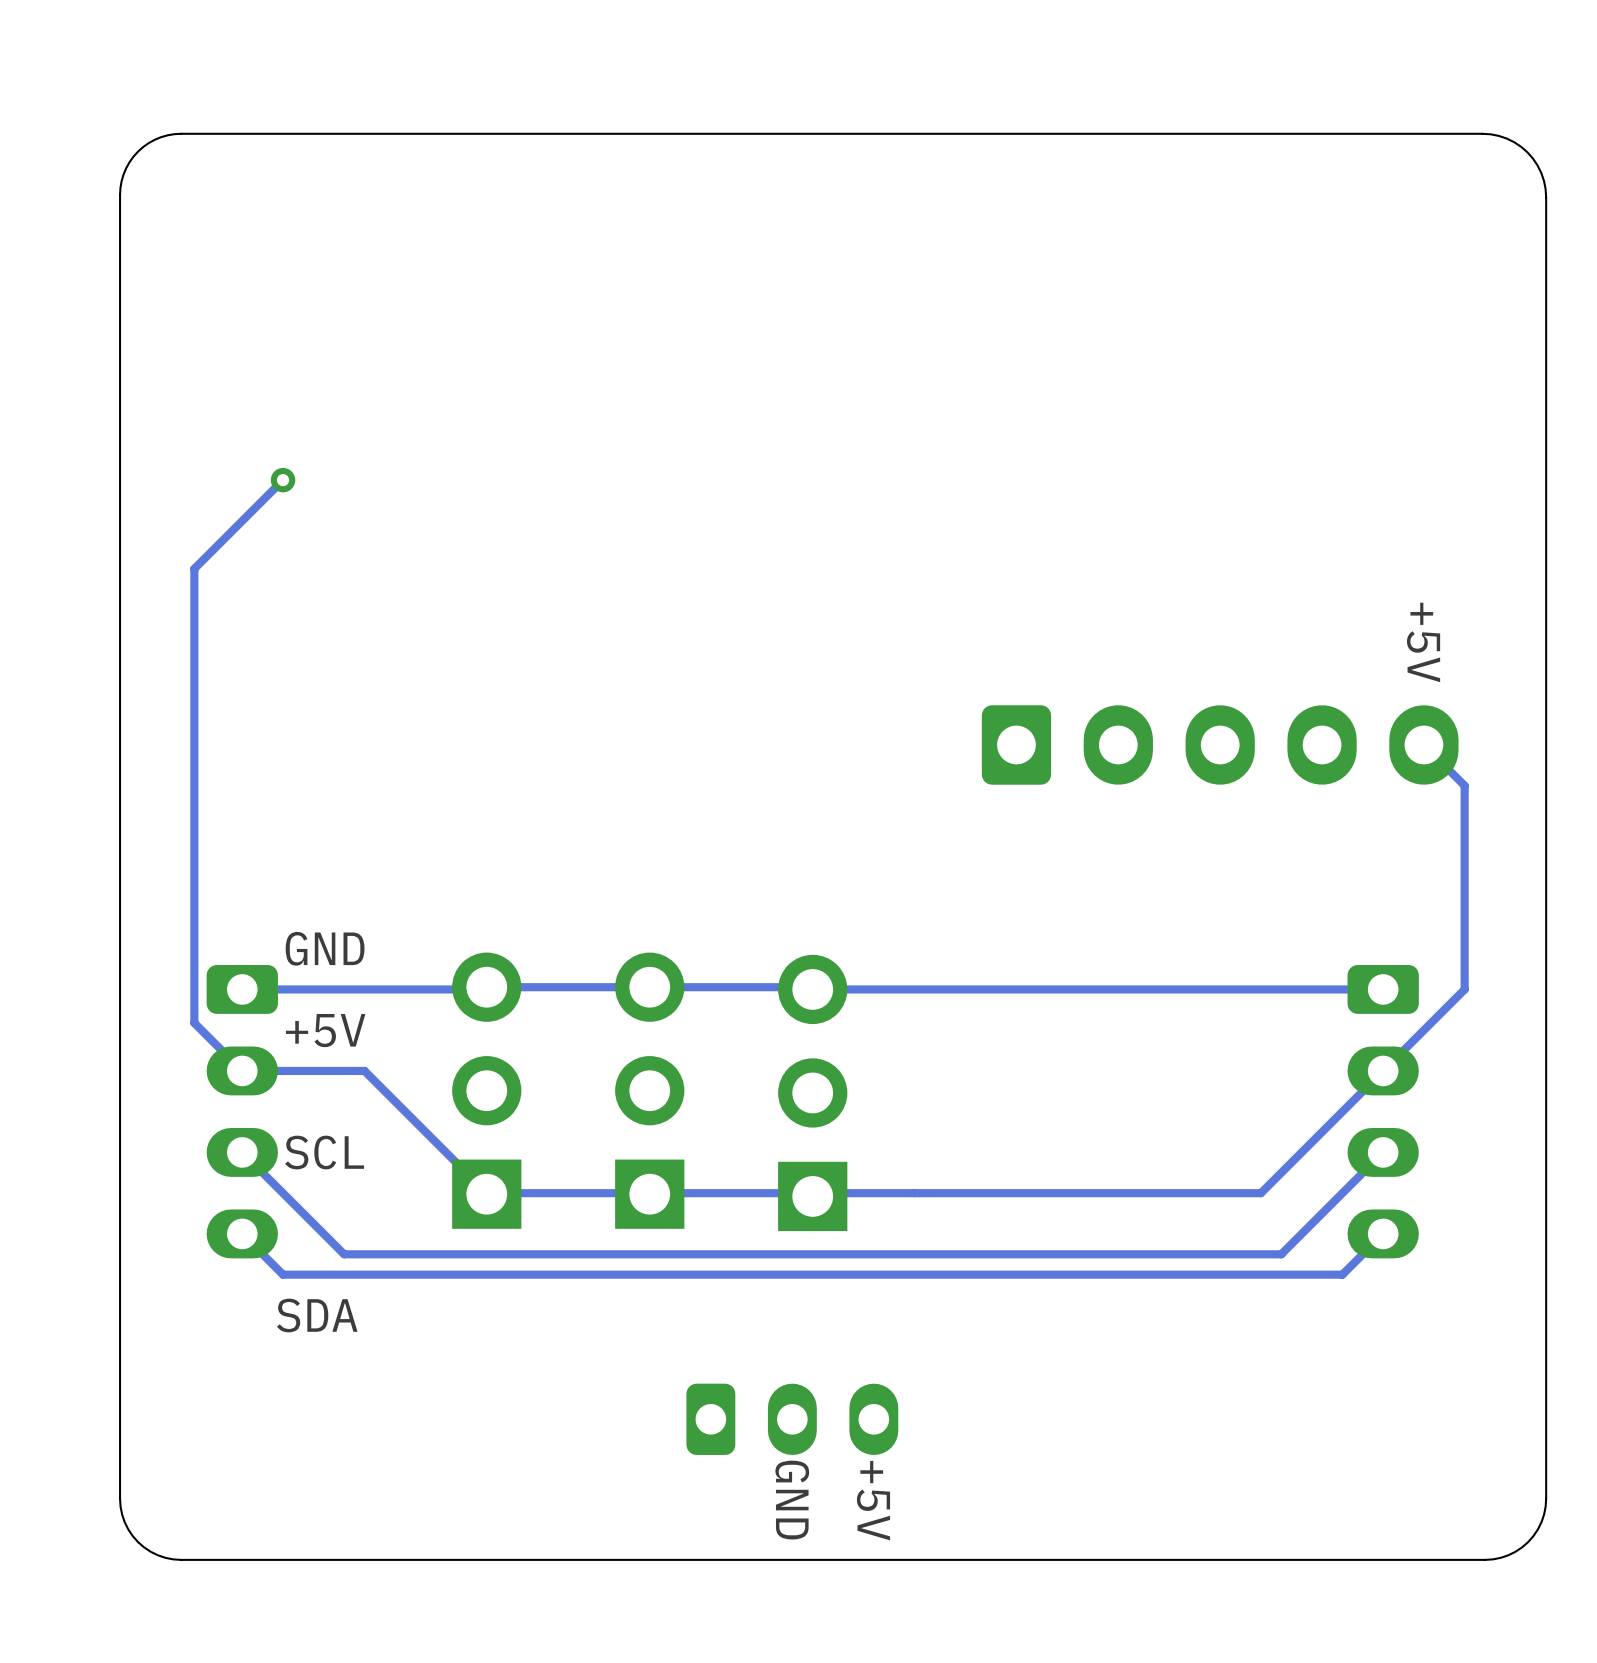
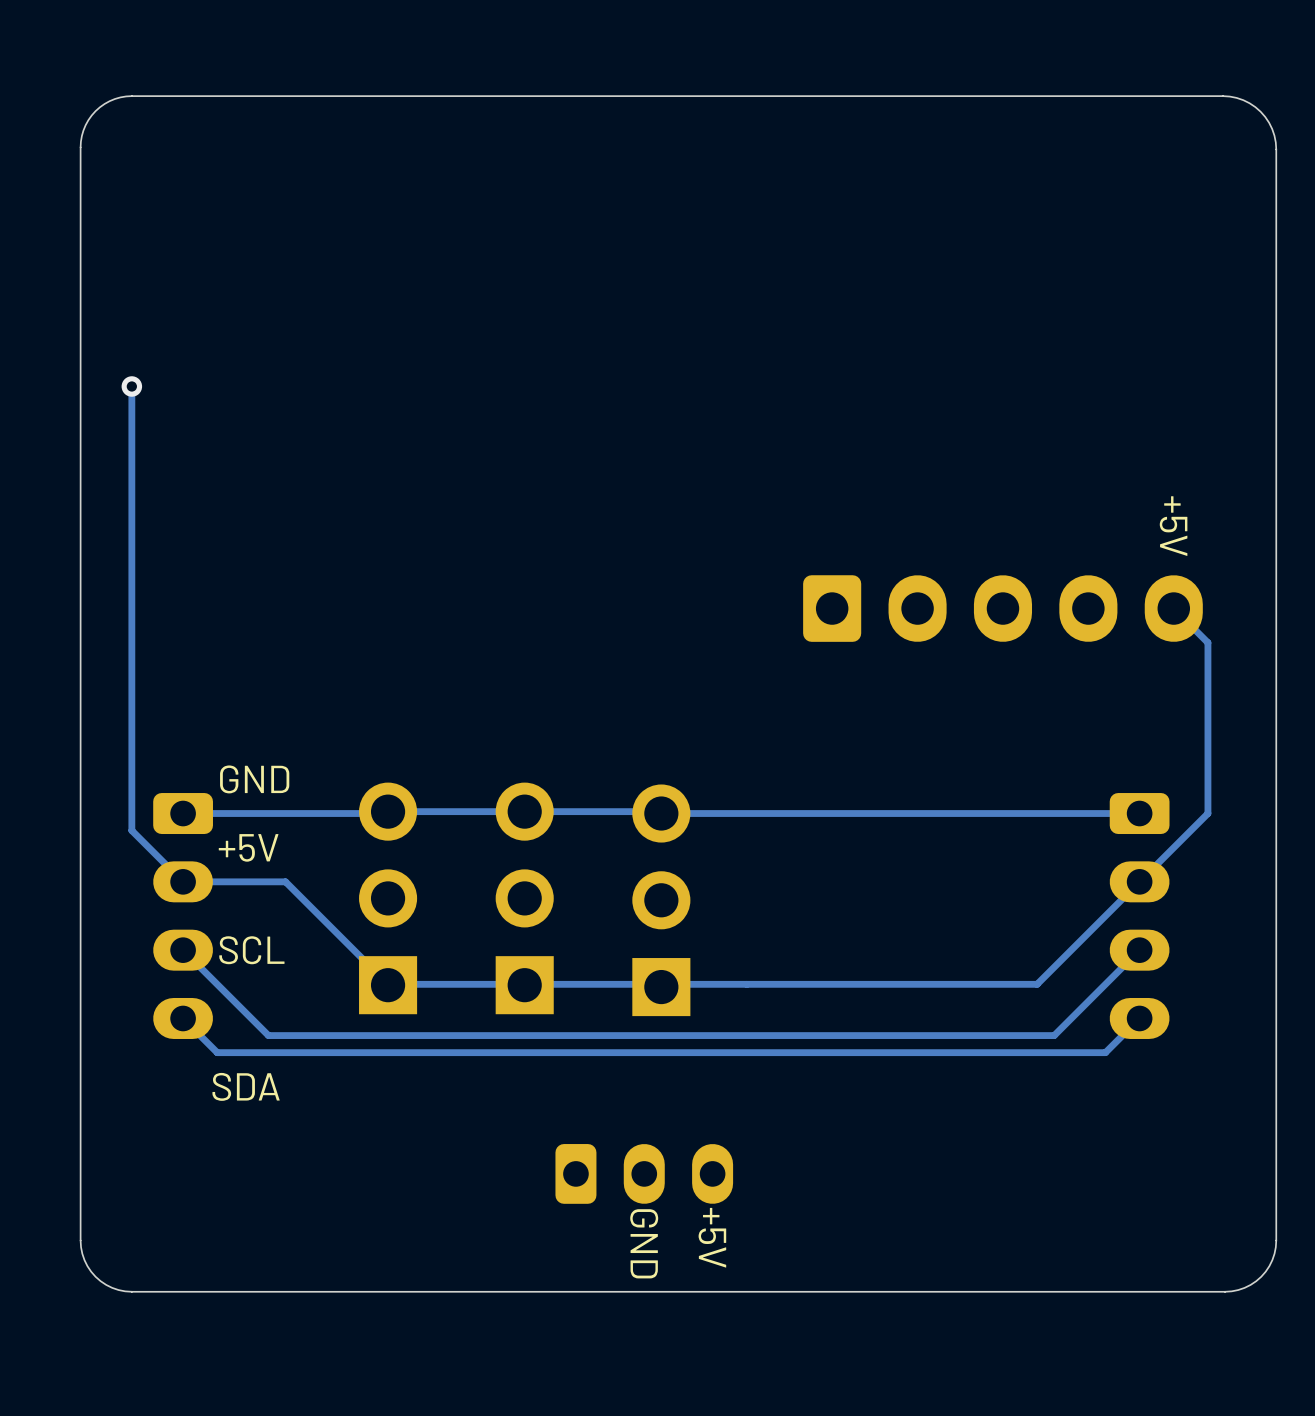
track: (283, 480) (194, 568) (194, 1023) -> (131, 386) (131, 830) (142, 841)
via position: (283, 480) -> (131, 386)

